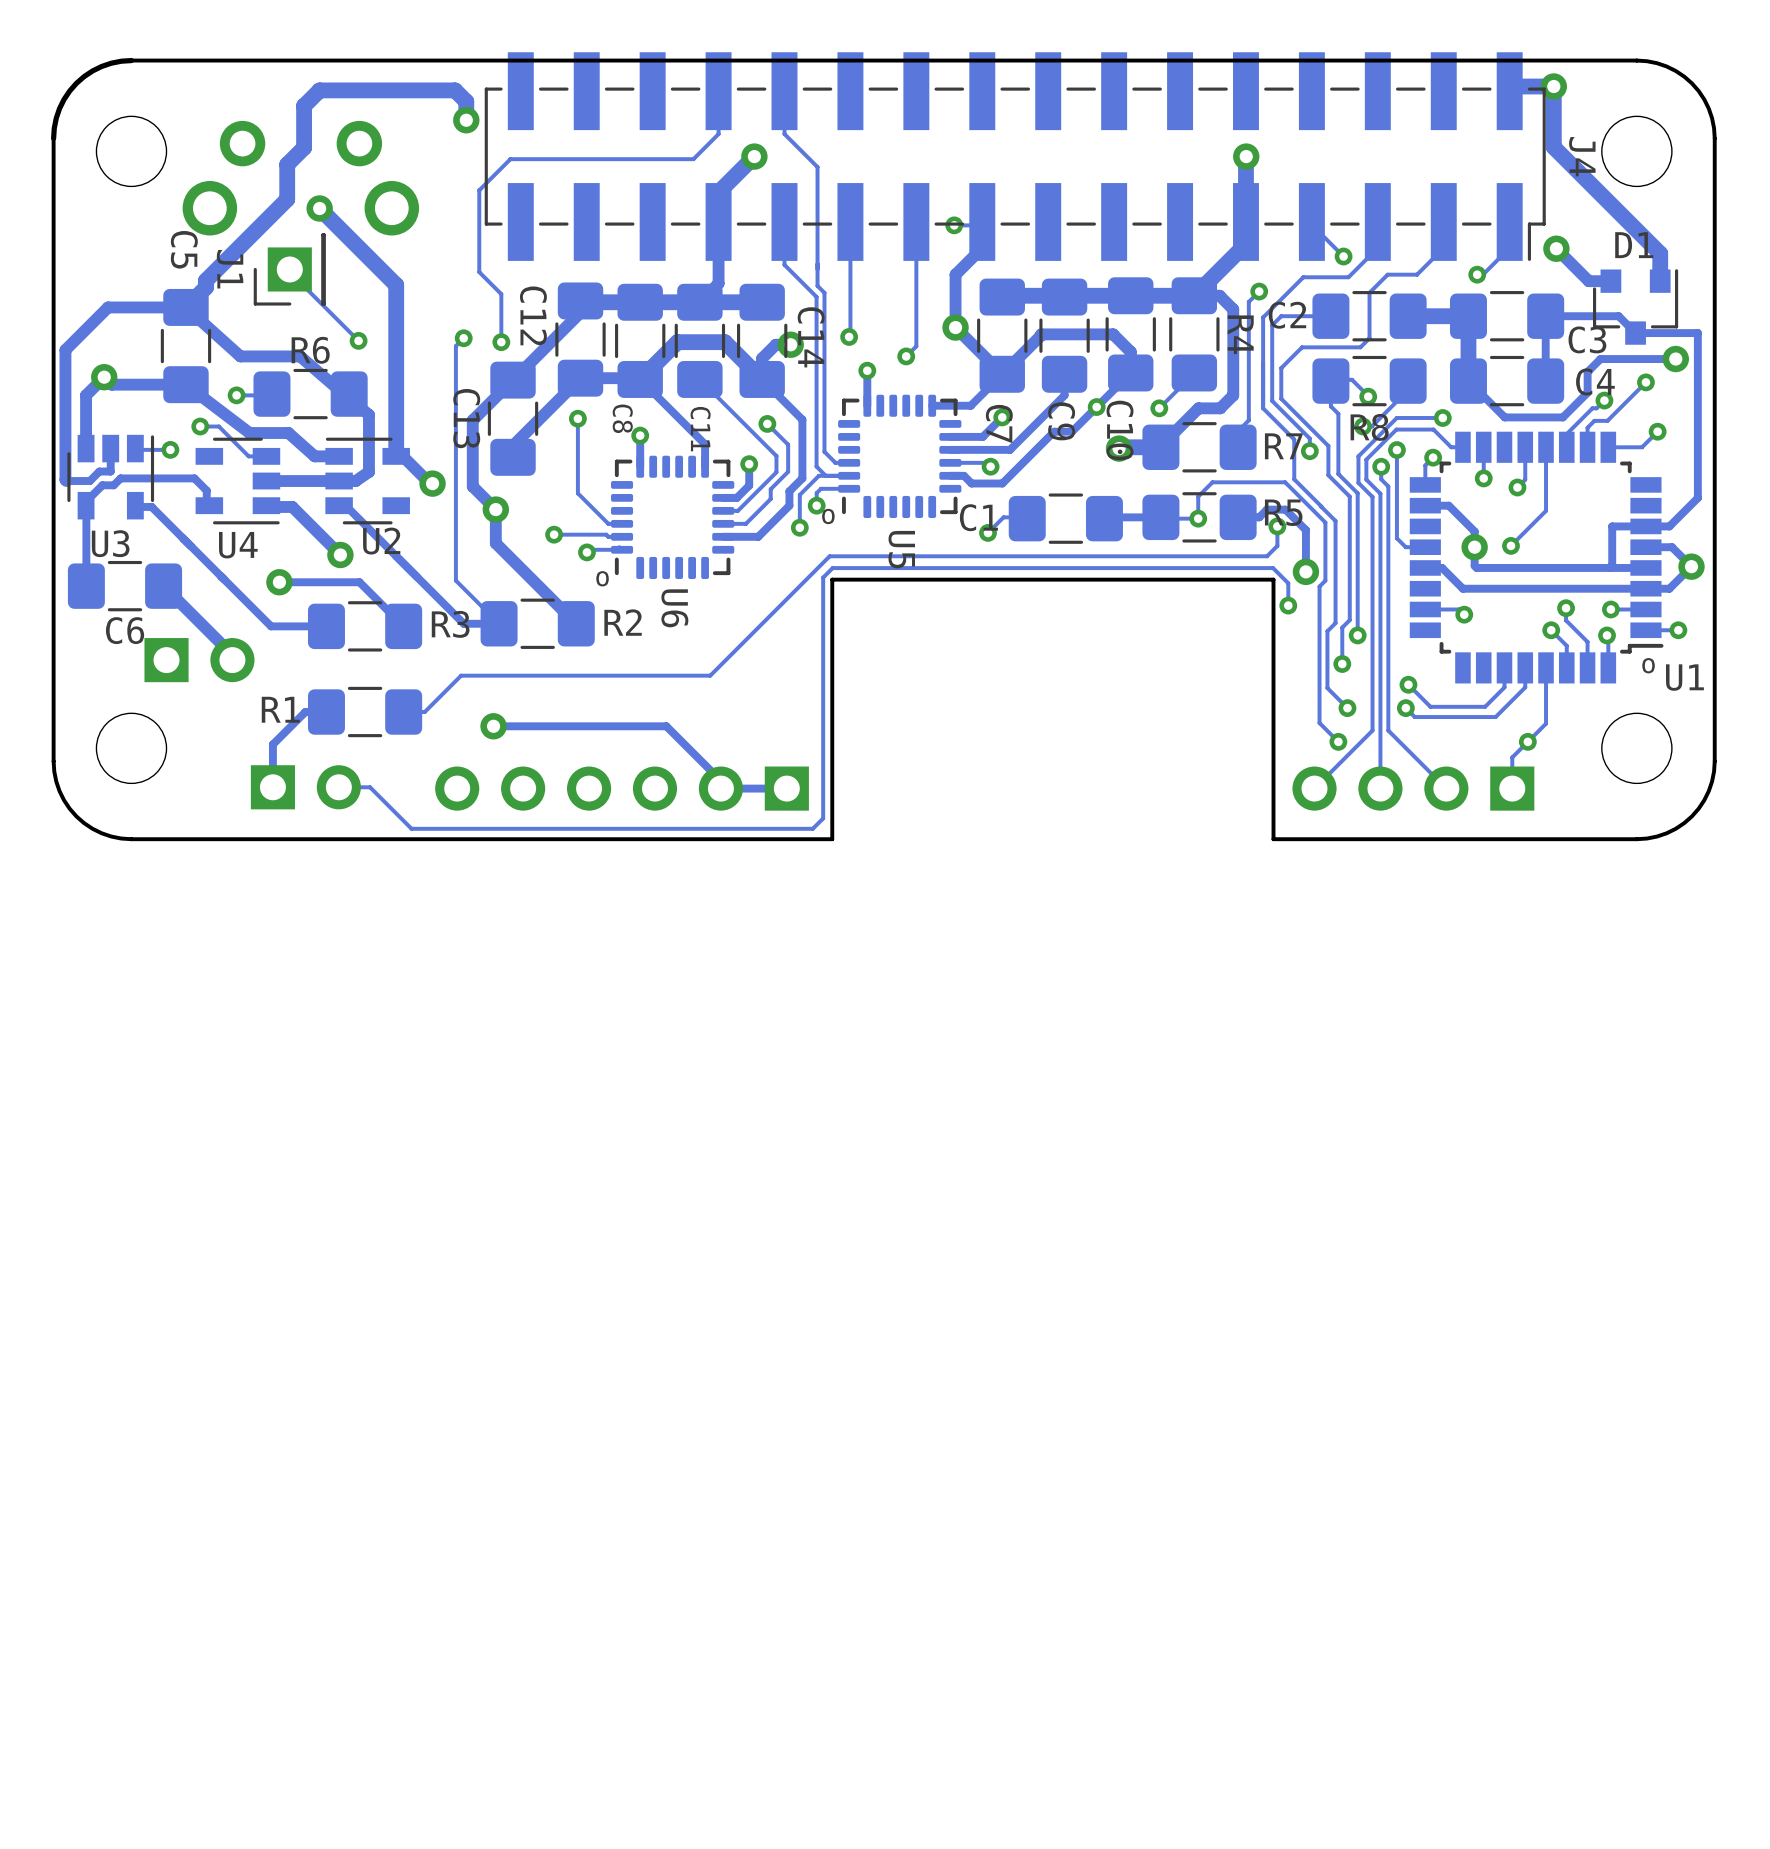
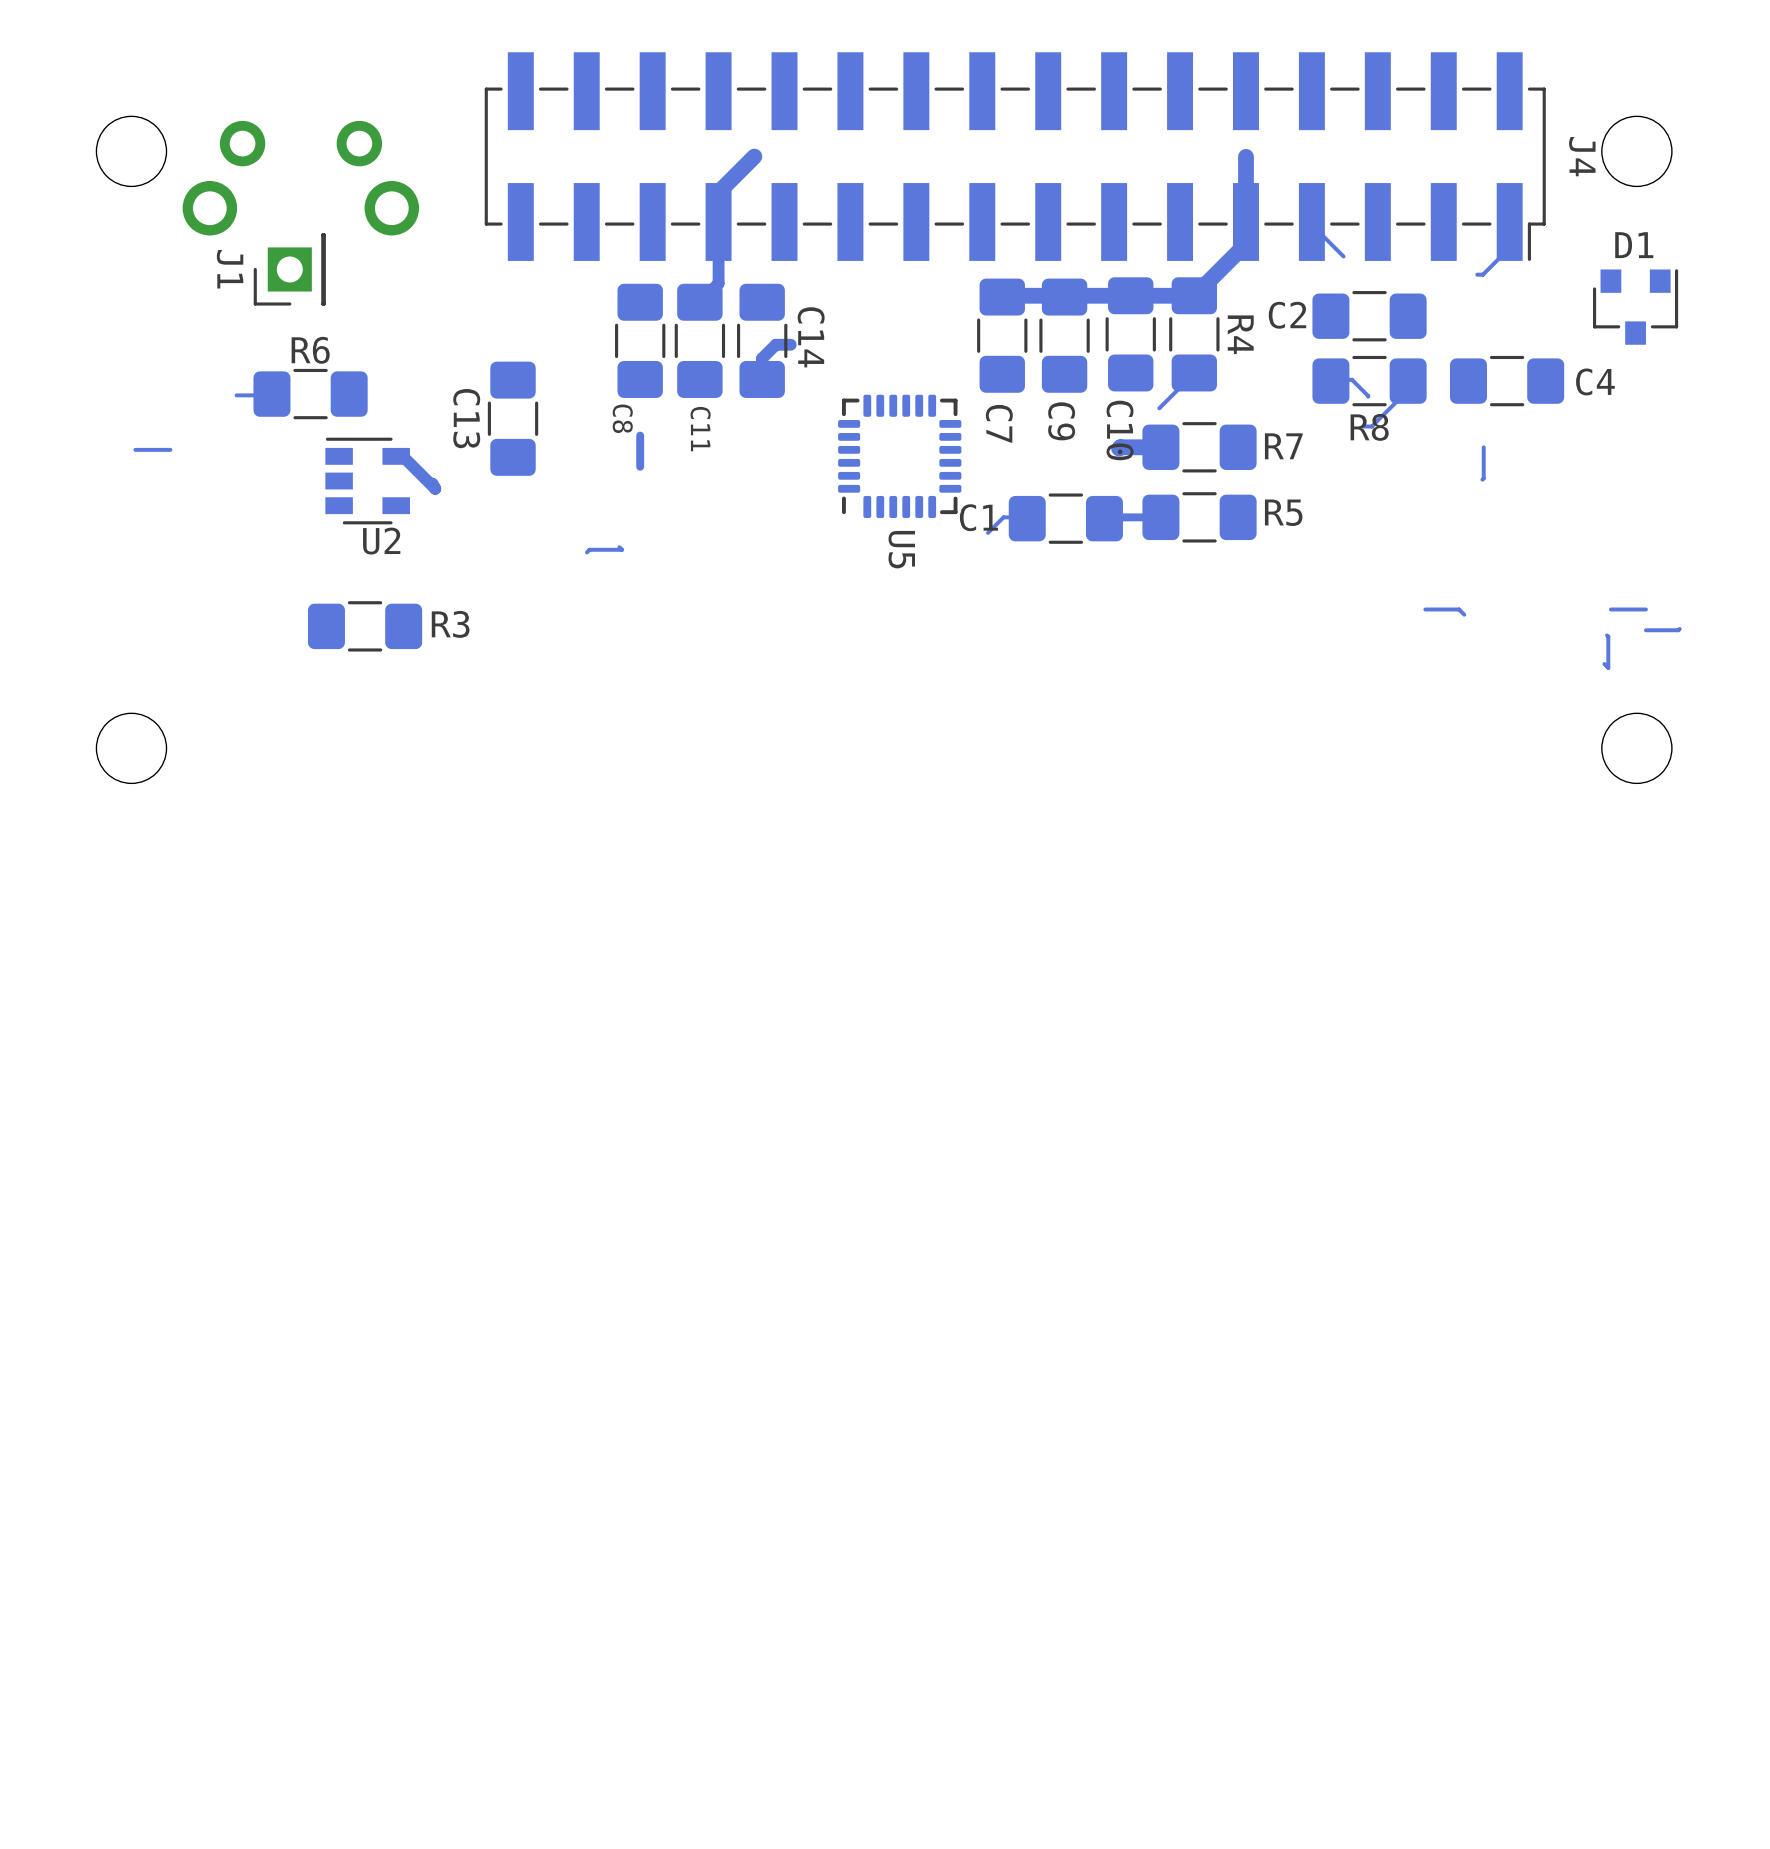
board edge: (1636, 60) (131, 60) (101, 66) (76, 83) (64, 99) (56, 118) (53, 138) (53, 761) (59, 791) (76, 816) (92, 828) (111, 836) (131, 839) (832, 839) (832, 579) (1273, 579) (1273, 839) (1636, 839) (1666, 833) (1684, 823) (1698, 808) (1708, 791) (1714, 771) (1714, 138) (1708, 108) (1691, 83) (1666, 66) (1636, 60) -> none
via: (1553, 86) -> none
track: (718, 91) (718, 134) (693, 159) (510, 159) (479, 190) (479, 272) (501, 294) (501, 342) -> none
track: (784, 91) (784, 134) (817, 167) (817, 285) (824, 292) (824, 451) (835, 462) (849, 462) -> none
track: (1509, 91) (1514, 86) (1553, 86) (1553, 147) (1660, 253) (1660, 281) -> none
track: (466, 120) (466, 101) (455, 90) (319, 90) (304, 105) (304, 147) (287, 164) (287, 199) (206, 280) (206, 287) (185, 307) -> none
via: (466, 120) -> none
via: (754, 156) -> none
via: (1246, 156) -> none
track: (1377, 196) (1377, 247) (1348, 277) (1303, 277) (1263, 317) (1263, 408) (1294, 439) (1294, 479) (1321, 506) -> none
track: (784, 197) (784, 264) (816, 296) (816, 466) (825, 475) -> none
track: (850, 199) (849, 336) -> none
track: (916, 199) (916, 346) (906, 356) -> none
track: (319, 208) (396, 285) (396, 456) -> none
via: (319, 208) -> none
track: (1443, 221) (1443, 247) (1417, 274) (1387, 274) (1369, 292) (1369, 338) (1360, 347) (1302, 347) (1281, 368) (1281, 398) (1328, 445) (1328, 475) (1349, 496) (1349, 620) (1342, 627) (1342, 664) -> none
track: (954, 225) (978, 225) (982, 221) (982, 247) (955, 274) (955, 327) (1002, 374) -> none
via: (954, 225) -> none
track: (1556, 248) (1588, 281) (1610, 281) -> none
via: (1556, 248) -> none
via: (1343, 256) -> none
track: (289, 269) (289, 272) (358, 340) -> none
via: (1477, 274) -> none
track: (1259, 291) (1248, 301) (1248, 420) (1240, 428) (1240, 453) -> none
via: (1259, 291) -> none
track: (1194, 295) (1219, 295) (1233, 309) (1233, 395) (1220, 408) (1198, 408) (1159, 447) -> none
track: (762, 302) (580, 300) (580, 312) (472, 420) (472, 486) (495, 509) (495, 543) (576, 623) -> none
track: (185, 307) (240, 356) (300, 356) (368, 414) (368, 471) (355, 481) (271, 479) -> none
track: (185, 307) (108, 307) (65, 350) (65, 479) (89, 481) (99, 471) (110, 471) (110, 449) -> none
track: (1338, 316) (1281, 316) (1272, 325) (1272, 400) (1309, 438) (1309, 451) -> none
track: (1408, 316) (1468, 316) (1468, 381) (1504, 417) (1562, 417) (1587, 392) (1587, 371) (1600, 359) (1675, 359) -> none
C3: (1507, 316) -> none
via: (955, 327) -> none
via: (849, 336) -> none
track: (463, 338) (455, 346) (455, 580) (499, 623) (463, 623) (345, 505) (340, 505) -> none
via: (463, 338) -> none
C12: (580, 339) -> none
via: (358, 340) -> none
via: (501, 342) -> none
via: (790, 344) -> none
C5: (185, 346) -> none
via: (906, 356) -> none
via: (1675, 359) -> none
track: (867, 370) (867, 405) -> none
via: (867, 370) -> none
track: (1002, 374) (1041, 334) (1113, 334) (1130, 351) (1130, 372) (1072, 431) (1054, 431) (1002, 483) (971, 483) (963, 475) (950, 475) -> none
track: (1002, 374) (970, 405) (932, 405) -> none
track: (1064, 374) (1064, 395) (1010, 449) (950, 449) -> none
via: (104, 377) -> none
track: (640, 379) (580, 378) (513, 445) (513, 457) -> none
track: (640, 379) (677, 342) (724, 342) (802, 419) (802, 478) (789, 491) (789, 505) (758, 536) (723, 536) -> none
track: (640, 379) (705, 444) (705, 466) -> none
track: (699, 379) (776, 456) (776, 472) (737, 510) (723, 510) -> none
track: (1330, 381) (1330, 406) (1338, 413) (1338, 474) (1357, 493) (1357, 635) -> none
track: (1545, 381) (1545, 316) (1618, 316) (1635, 333) (1697, 333) (1697, 498) (1669, 526) (1612, 526) (1612, 565) (1609, 567) -> none
track: (1645, 382) (1607, 420) (1594, 420) (1587, 427) (1587, 447) -> none
via: (1645, 382) -> none
via: (236, 395) -> none
via: (1368, 396) -> none
track: (1604, 400) (1596, 408) (1592, 408) (1566, 434) (1566, 447) -> none
via: (1604, 400) -> none
via: (1096, 407) -> none
via: (1159, 408) -> none
track: (1002, 417) (982, 436) (950, 436) -> none
via: (1002, 417) -> none
track: (1442, 417) (1396, 417) (1358, 456) (1358, 482) (1372, 496) (1372, 730) (1314, 788) -> none
via: (1442, 417) -> none
track: (577, 418) (577, 493) (608, 523) (622, 523) -> none
via: (577, 418) -> none
track: (767, 423) (788, 444) (788, 471) (770, 489) (770, 499) (745, 523) (723, 523) -> none
via: (767, 423) -> none
track: (200, 426) (218, 426) (248, 456) (266, 456) -> none
via: (200, 426) -> none
via: (1363, 426) -> none
track: (1657, 431) (1642, 447) (1608, 447) -> none
via: (1657, 431) -> none
via: (640, 435) -> none
track: (1465, 444) (1462, 447) (1451, 447) (1433, 429) (1396, 429) (1366, 459) (1366, 479) (1380, 493) (1380, 788) -> none
track: (1525, 447) (1525, 479) (1517, 487) -> none
track: (1546, 447) (1546, 510) (1510, 545) -> none
via: (1119, 448) -> none
track: (86, 449) (86, 395) (104, 377) (111, 384) (185, 384) (249, 433) (288, 433) (314, 456) (340, 456) -> none
via: (170, 449) -> none
track: (1396, 450) (1396, 538) (1405, 547) (1425, 547) -> none
via: (1396, 450) -> none
via: (1309, 451) -> none
track: (1433, 457) (1425, 465) (1425, 484) -> none
via: (1433, 457) -> none
track: (950, 462) (986, 462) (990, 466) -> none
track: (749, 464) (749, 485) (736, 497) (723, 497) -> none
via: (749, 464) -> none
via: (990, 466) -> none
track: (1381, 466) (1381, 479) (1388, 486) (1388, 730) (1446, 788) -> none
via: (1381, 466) -> none
track: (849, 475) (818, 475) (799, 494) (799, 527) -> none
U3: (110, 477) -> none
via: (1483, 478) -> none
U4: (237, 481) -> none
via: (432, 483) -> none
via: (1517, 487) -> none
track: (849, 488) (820, 488) (816, 493) (816, 505) -> none
via: (816, 505) -> none
track: (1425, 505) (1448, 505) (1474, 531) (1474, 565) (1476, 567) (1645, 567) -> none
track: (86, 506) (86, 586) -> none
track: (135, 506) (151, 506) (271, 626) (326, 626) -> none
track: (206, 506) (206, 490) (194, 478) (120, 478) (113, 485) (102, 485) (86, 501) (85, 507) -> none
track: (263, 506) (292, 506) (340, 554) -> none
track: (1321, 506) (1335, 521) (1335, 623) (1327, 631) (1327, 688) (1347, 708) -> none
via: (495, 509) -> none
text: o (828, 516) -> none
U6: (672, 517) -> none
track: (1238, 517) (1259, 517) (1266, 509) (1285, 509) (1305, 530) (1305, 571) -> none
via: (1198, 518) -> none
track: (1160, 519) (1198, 518) (1198, 496) (1212, 482) (1285, 482) (1325, 522) (1325, 580) (1319, 586) (1319, 723) (1338, 741) -> none
track: (1277, 526) (1277, 545) (1267, 556) (829, 556) (710, 675) (461, 675) (424, 712) (403, 712) -> none
via: (1277, 526) -> none
via: (799, 527) -> none
via: (987, 532) -> none
via: (554, 534) -> none
track: (553, 535) (606, 534) (608, 536) (622, 536) -> none
via: (1510, 545) -> none
via: (1474, 547) -> none
track: (1645, 547) (1672, 547) (1691, 566) (1669, 588) (1462, 588) (1442, 567) (1425, 567) -> none
via: (586, 552) -> none
via: (340, 554) -> none
U1: (1536, 557) -> none
via: (1691, 566) -> none
via: (1305, 571) -> none
text: o (602, 578) -> none
track: (279, 582) (359, 582) (403, 626) -> none
via: (279, 582) -> none
C6: (124, 586) -> none
track: (163, 586) (232, 654) (232, 660) -> none
track: (1288, 605) (1288, 583) (1273, 568) (832, 568) (823, 577) (823, 818) (812, 828) (411, 828) (370, 787) (338, 787) -> none
via: (1288, 605) -> none
track: (1566, 608) (1566, 620) (1587, 641) (1587, 667) -> none
via: (1566, 608) -> none
via: (1610, 609) -> none
via: (1464, 614) -> none
R2: (537, 623) -> none
track: (1551, 630) (1566, 645) (1566, 667) -> none
via: (1551, 630) -> none
via: (1678, 630) -> none
via: (1357, 635) -> none
via: (1607, 635) -> none
part: (199, 660) -> none
via: (1342, 664) -> none
text: o (1648, 665) -> none
track: (1504, 667) (1504, 687) (1485, 706) (1430, 706) (1408, 684) -> none
track: (1525, 667) (1525, 687) (1495, 717) (1414, 717) (1405, 708) -> none
track: (1546, 667) (1546, 723) (1512, 757) (1512, 788) -> none
via: (1408, 684) -> none
via: (1347, 708) -> none
via: (1405, 708) -> none
track: (326, 712) (305, 712) (272, 744) (271, 786) -> none
R1: (365, 712) -> none
track: (493, 726) (666, 726) (728, 788) (794, 788) -> none
via: (493, 726) -> none
via: (1338, 741) -> none
via: (1527, 741) -> none
part: (305, 787) -> none
part: (622, 788) -> none
part: (1413, 788) -> none

